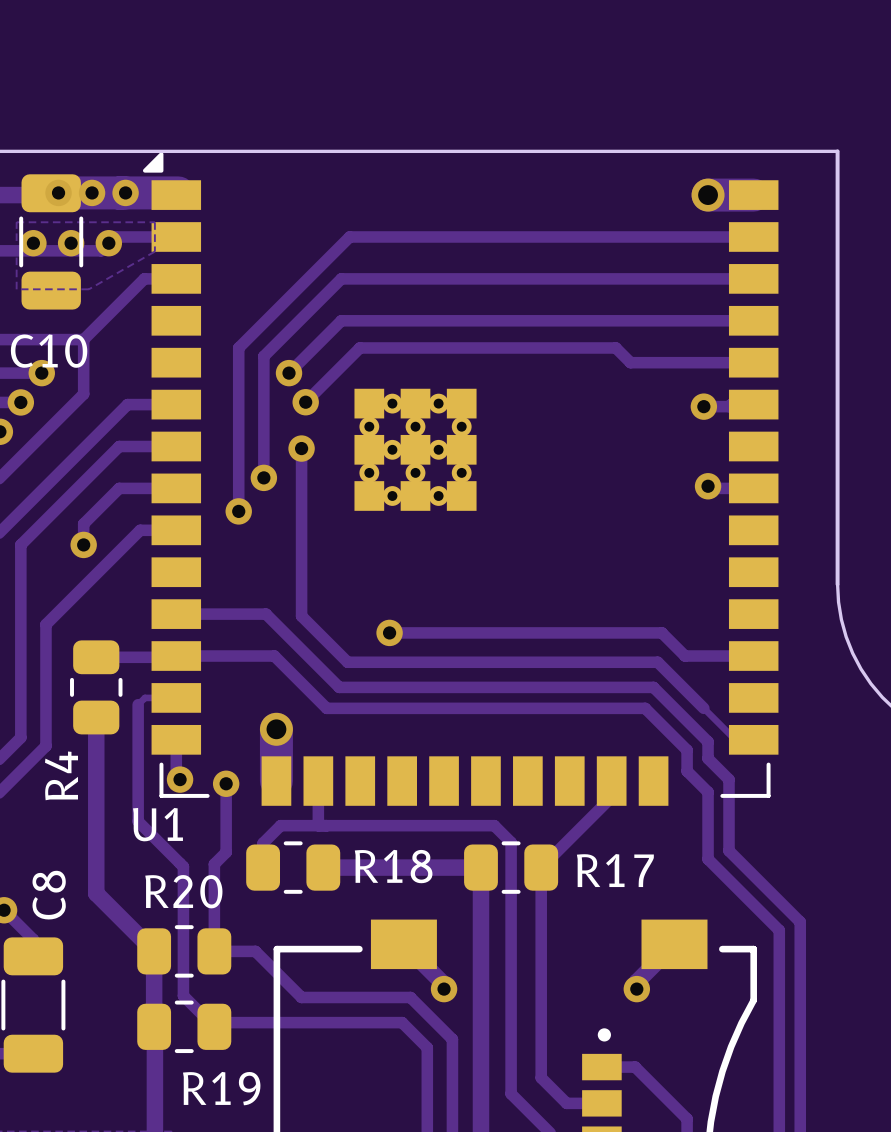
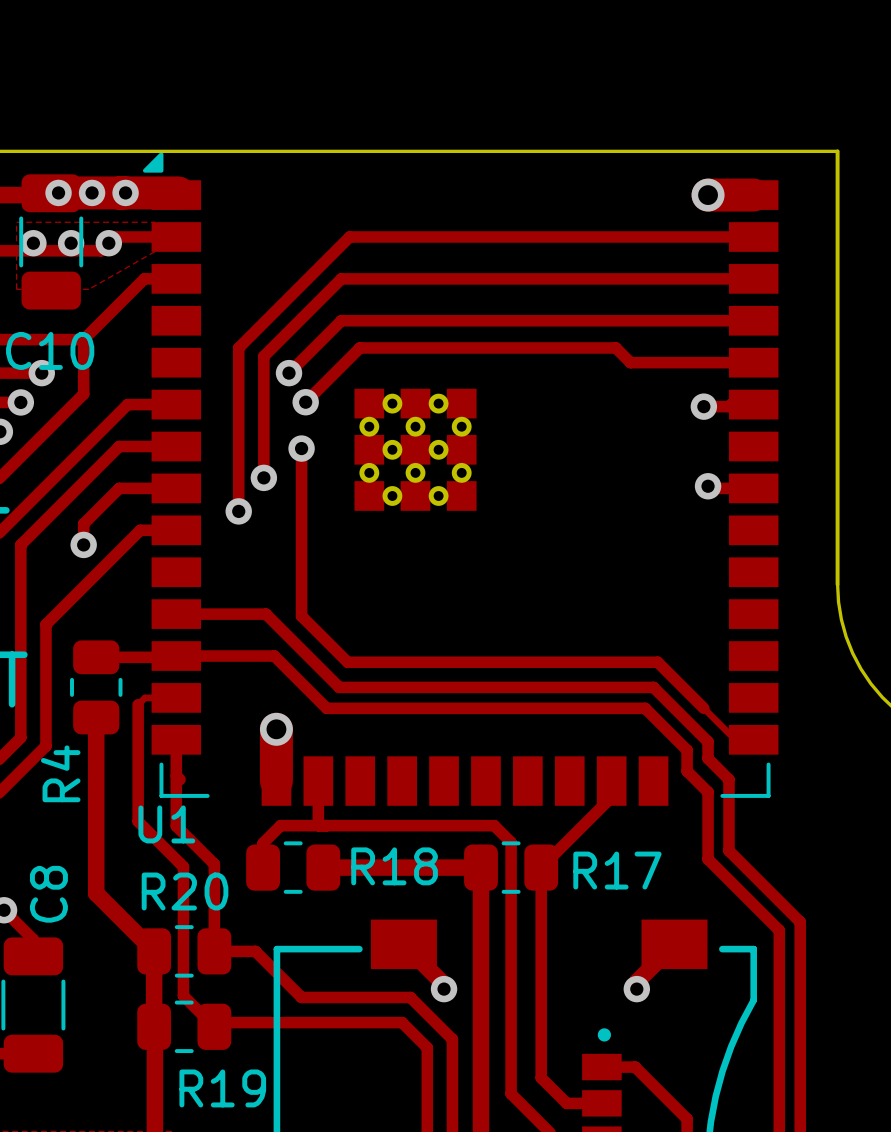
track: (389, 632) (661, 632) (685, 656) (753, 656) -> none
via: (389, 632) -> none
via: (180, 779) -> none
track: (226, 783) (226, 852) (214, 864) -> (176, 775) (176, 826) (214, 864)
via: (226, 783) -> none

